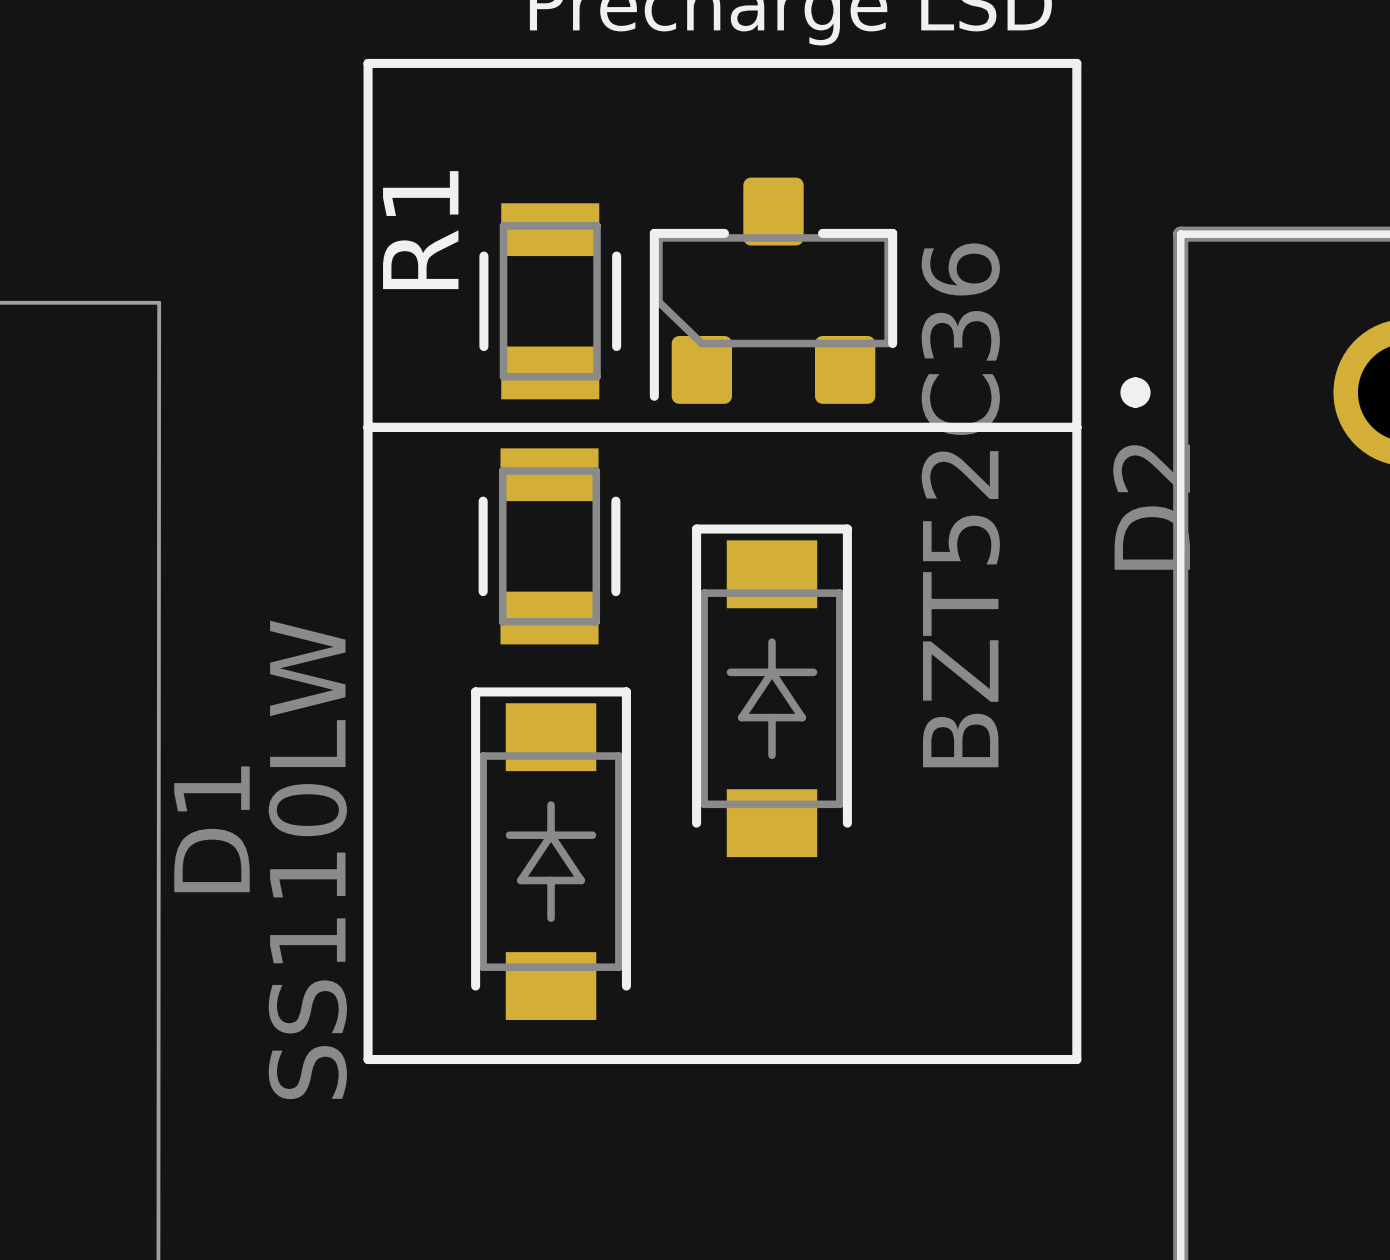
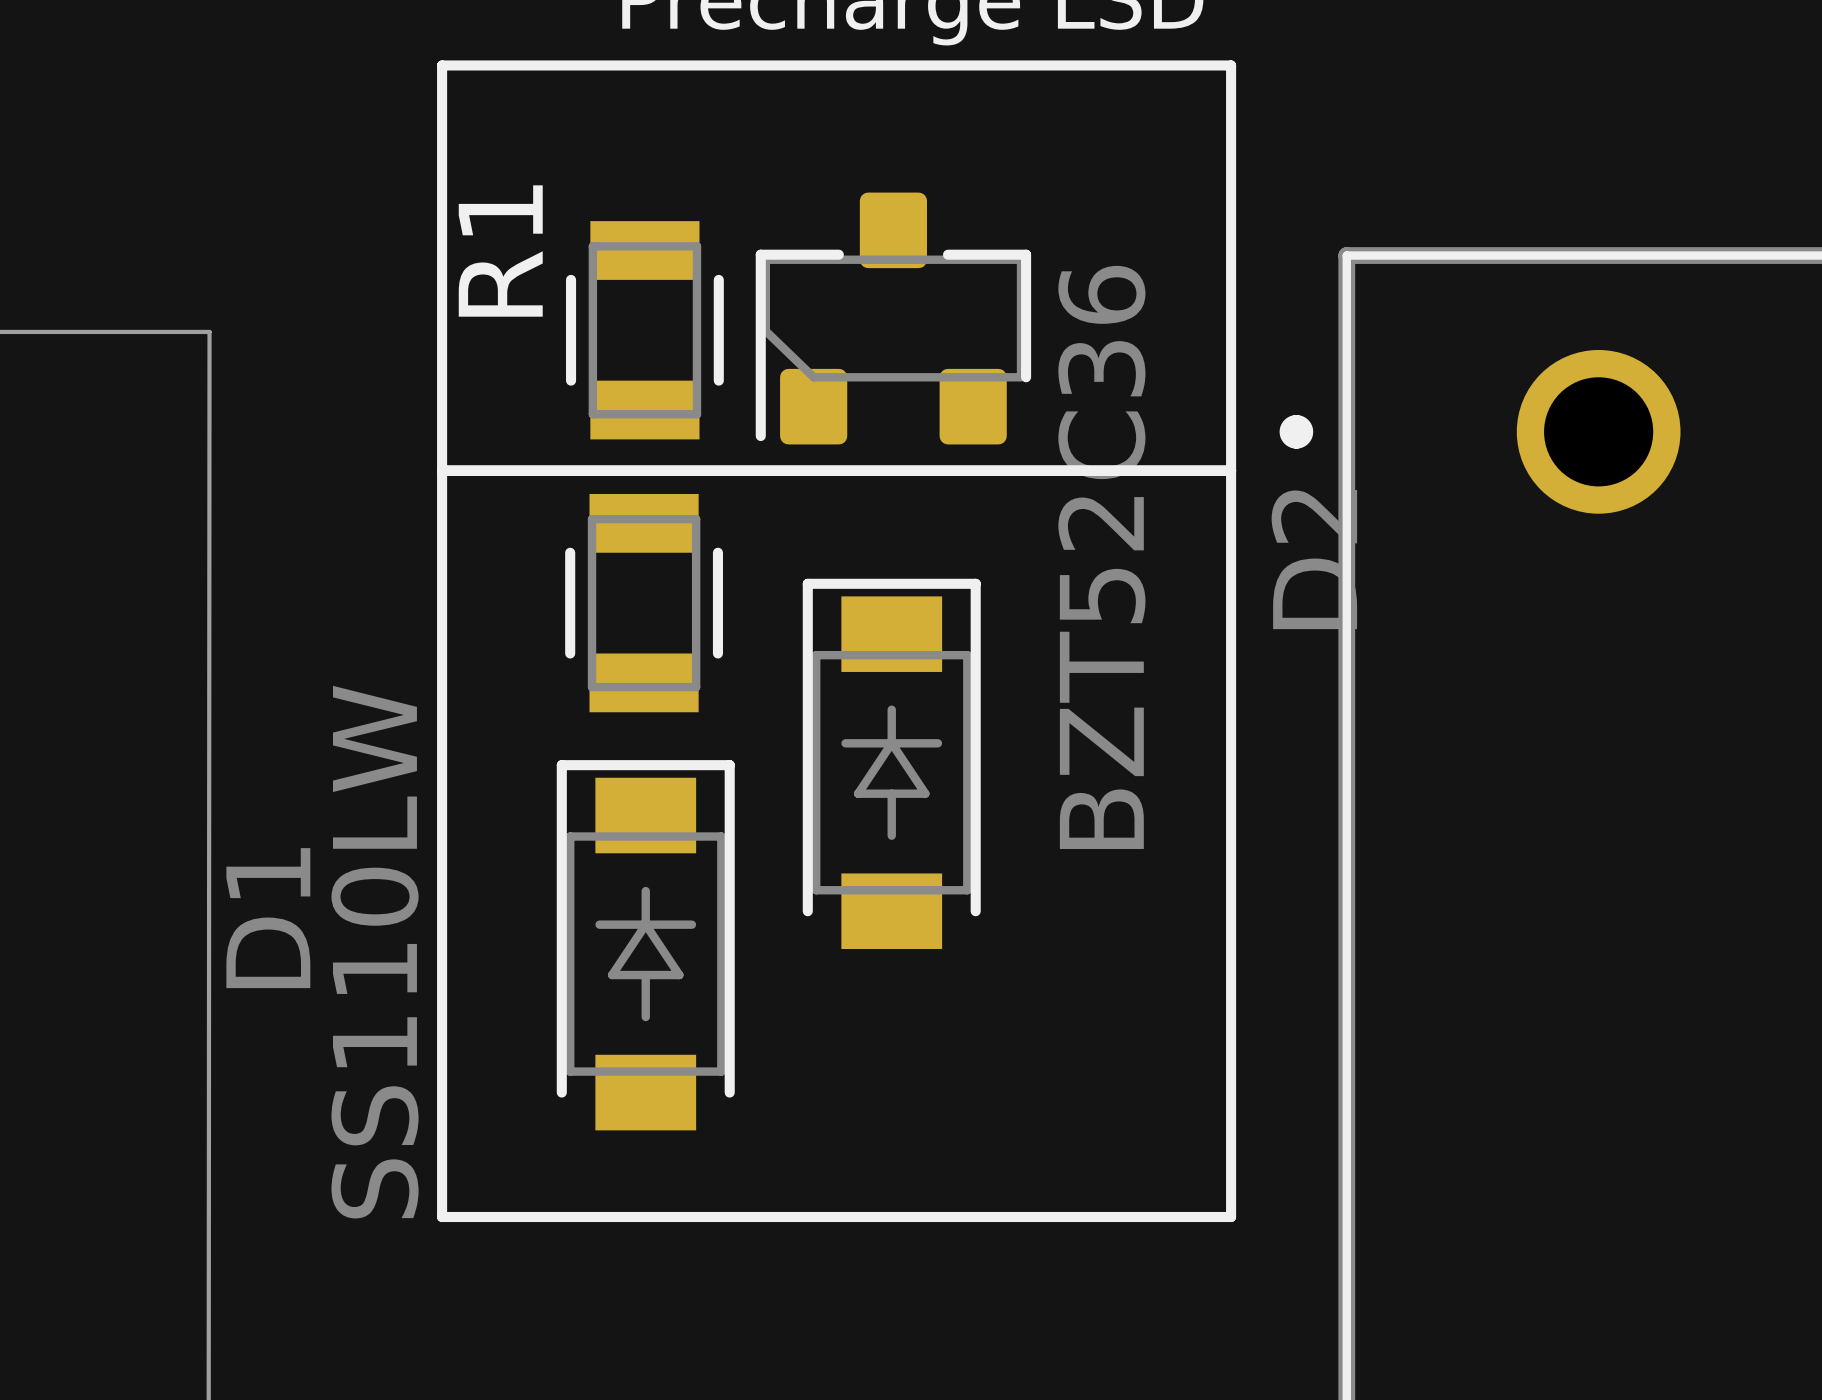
line: (368, 1059) (1076, 1059) -> (442, 1174) (442, 1216) (1231, 1216) (1231, 1174)

